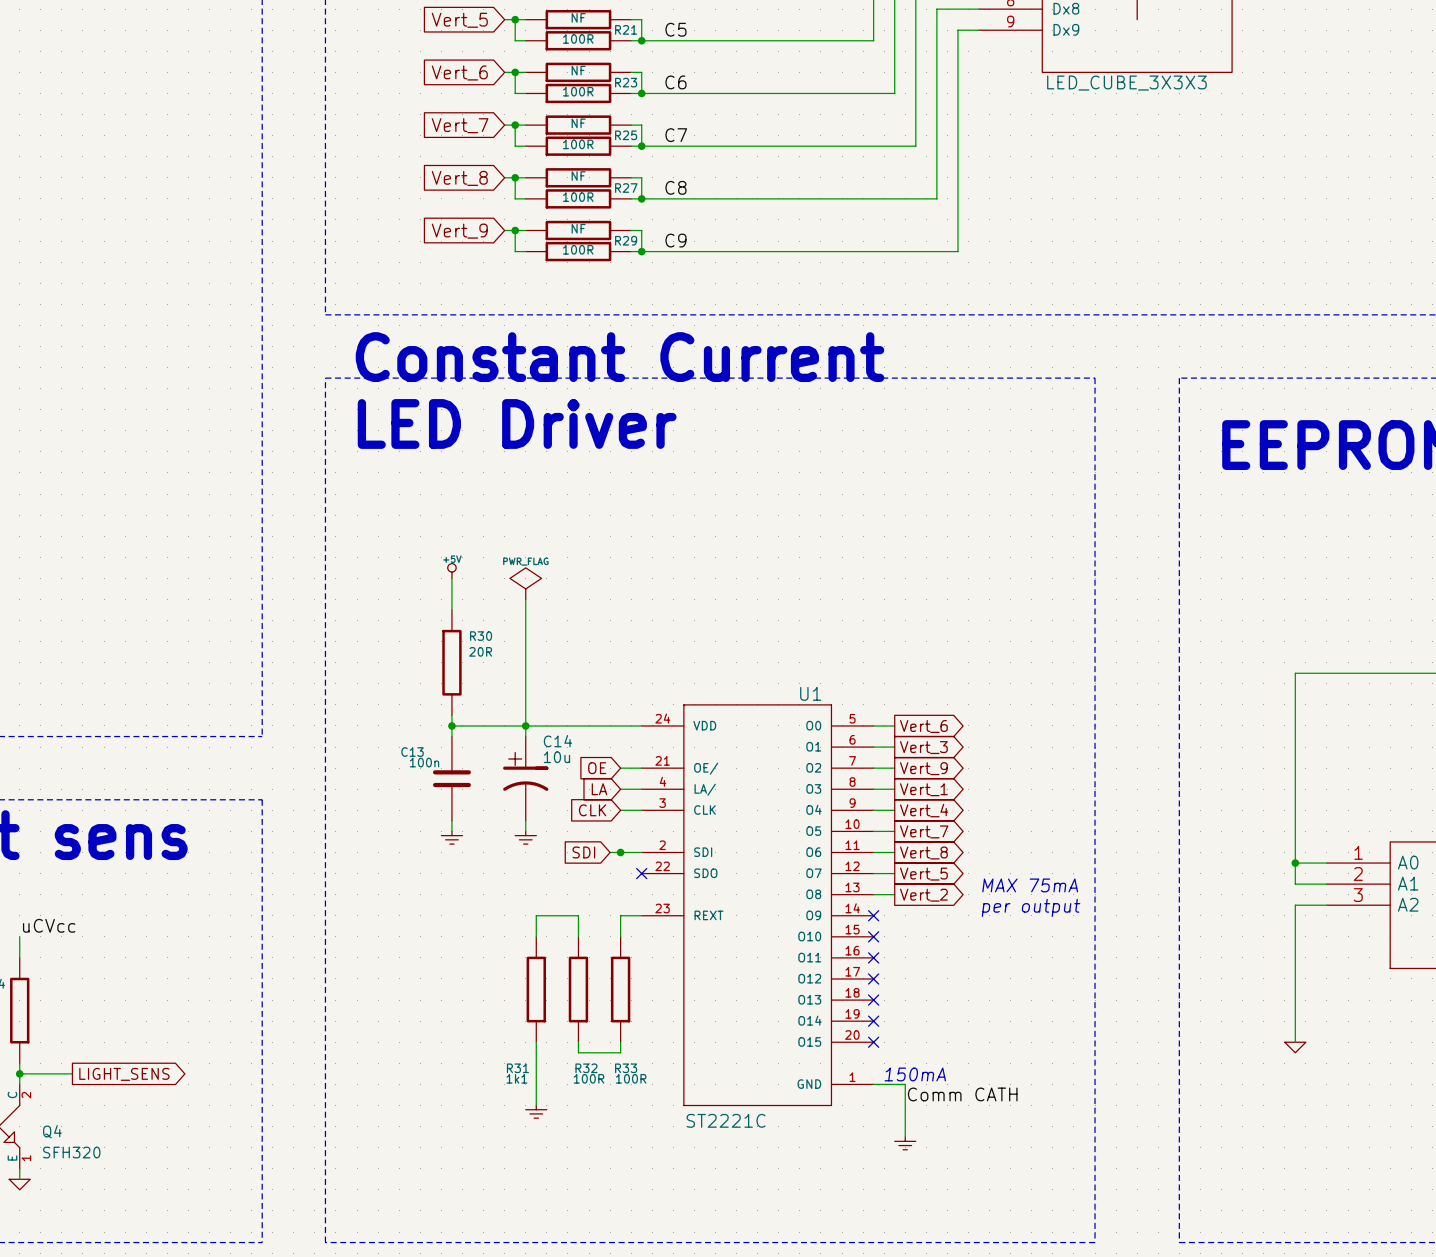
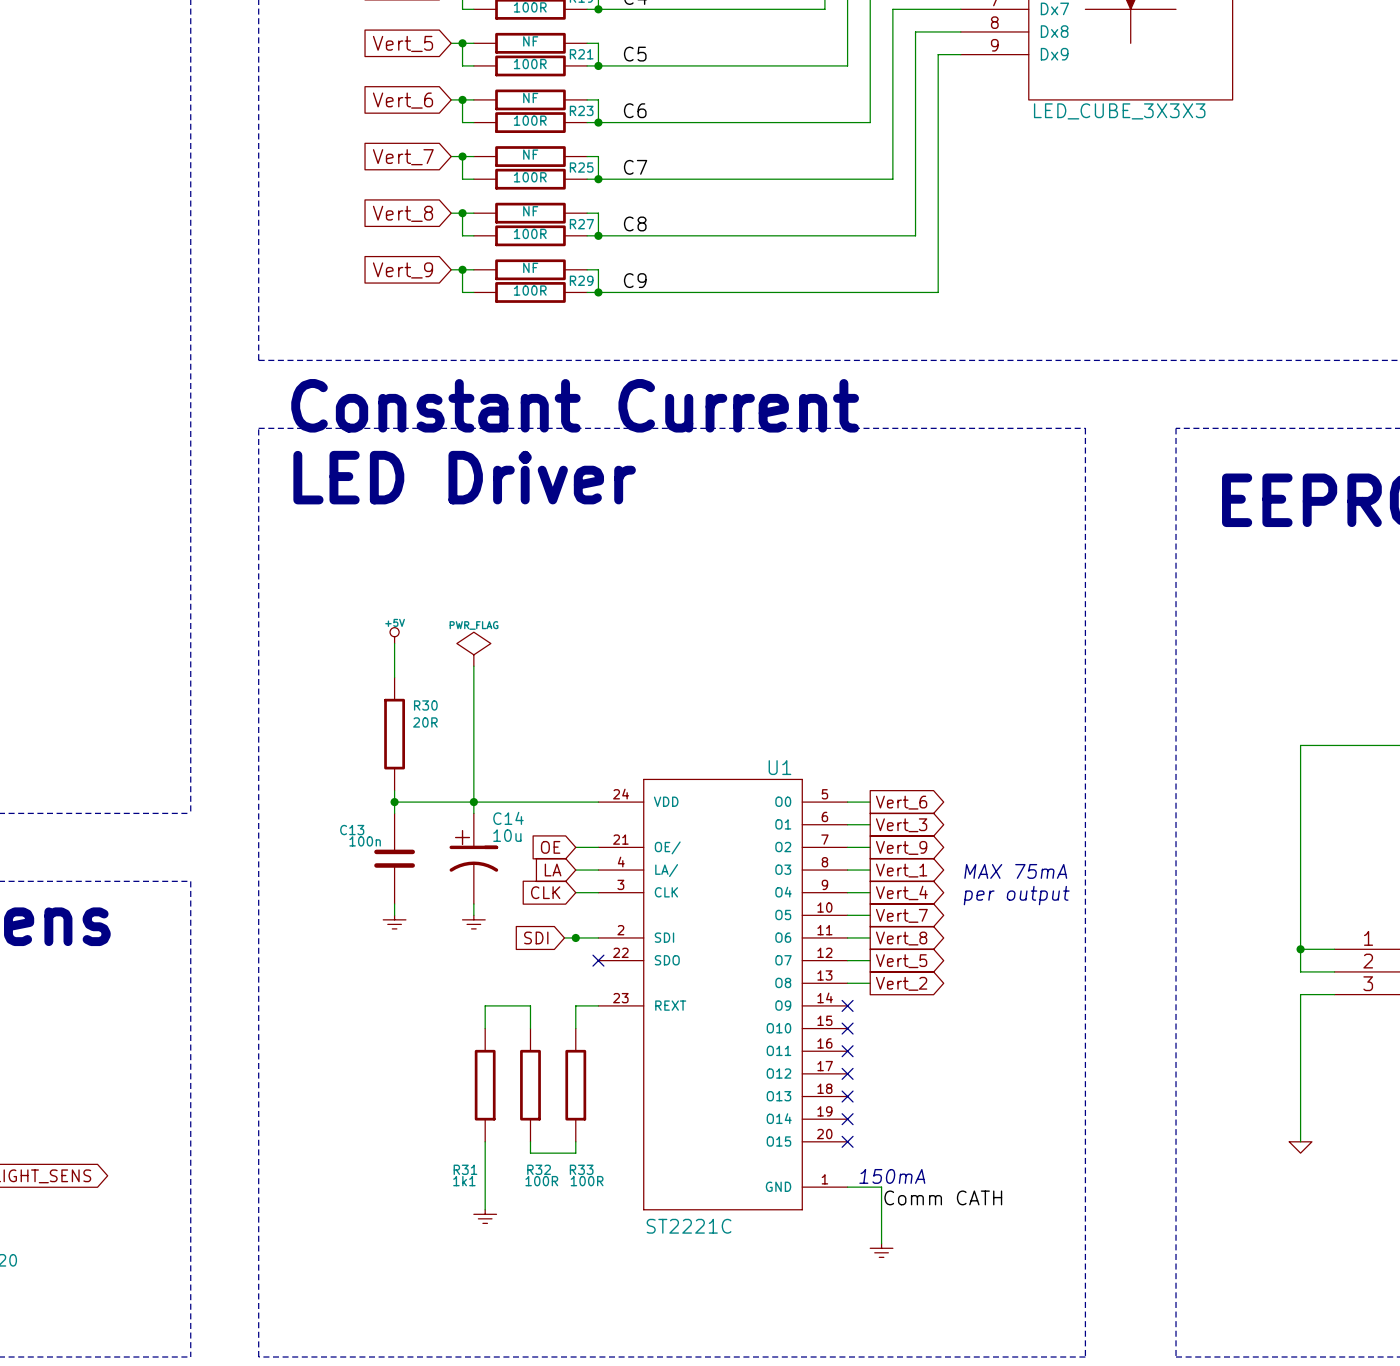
text position: MAX 75mA (1030, 885) -> MAX 75mA (1015, 871)
text position: per output (1031, 907) -> per output (1016, 895)

